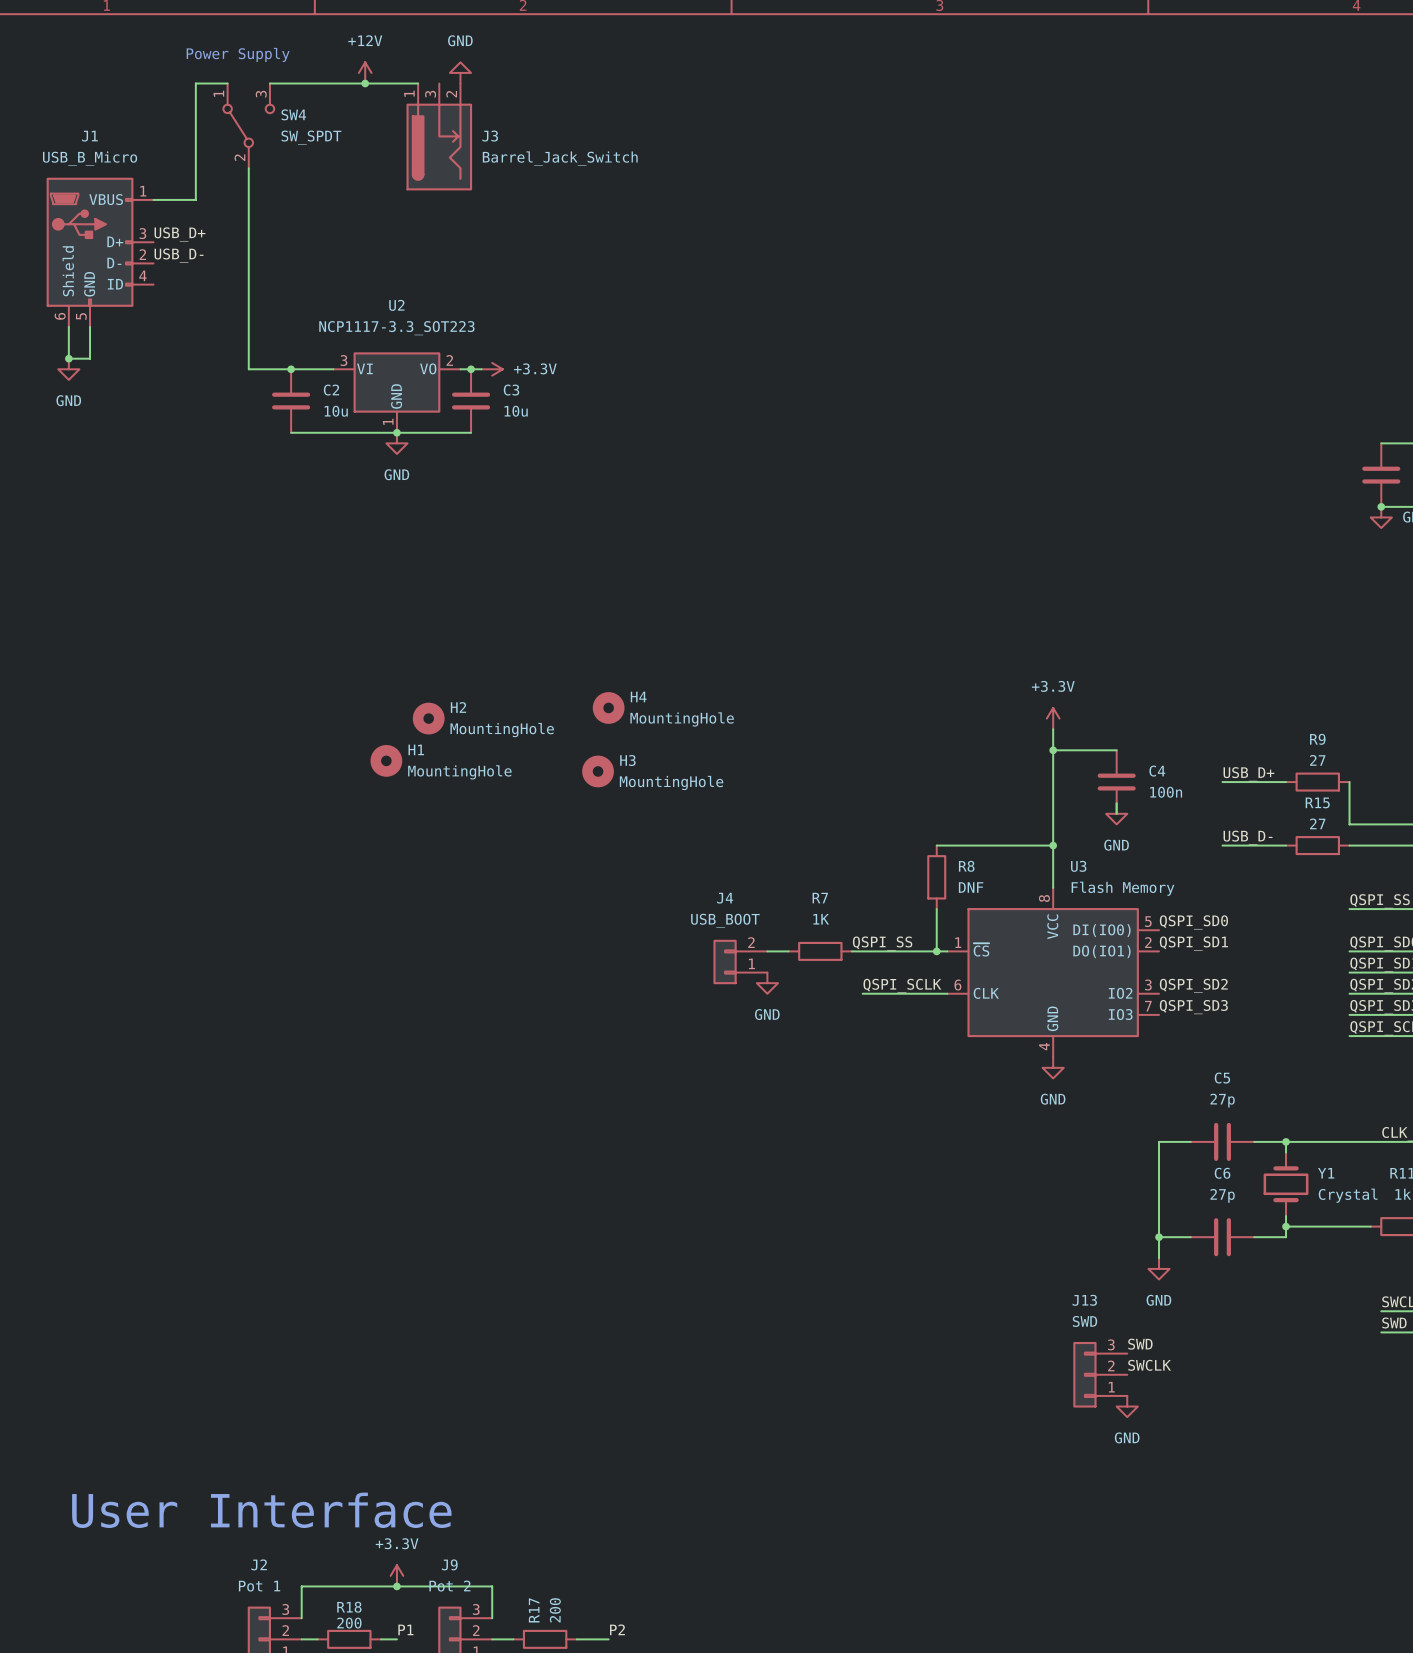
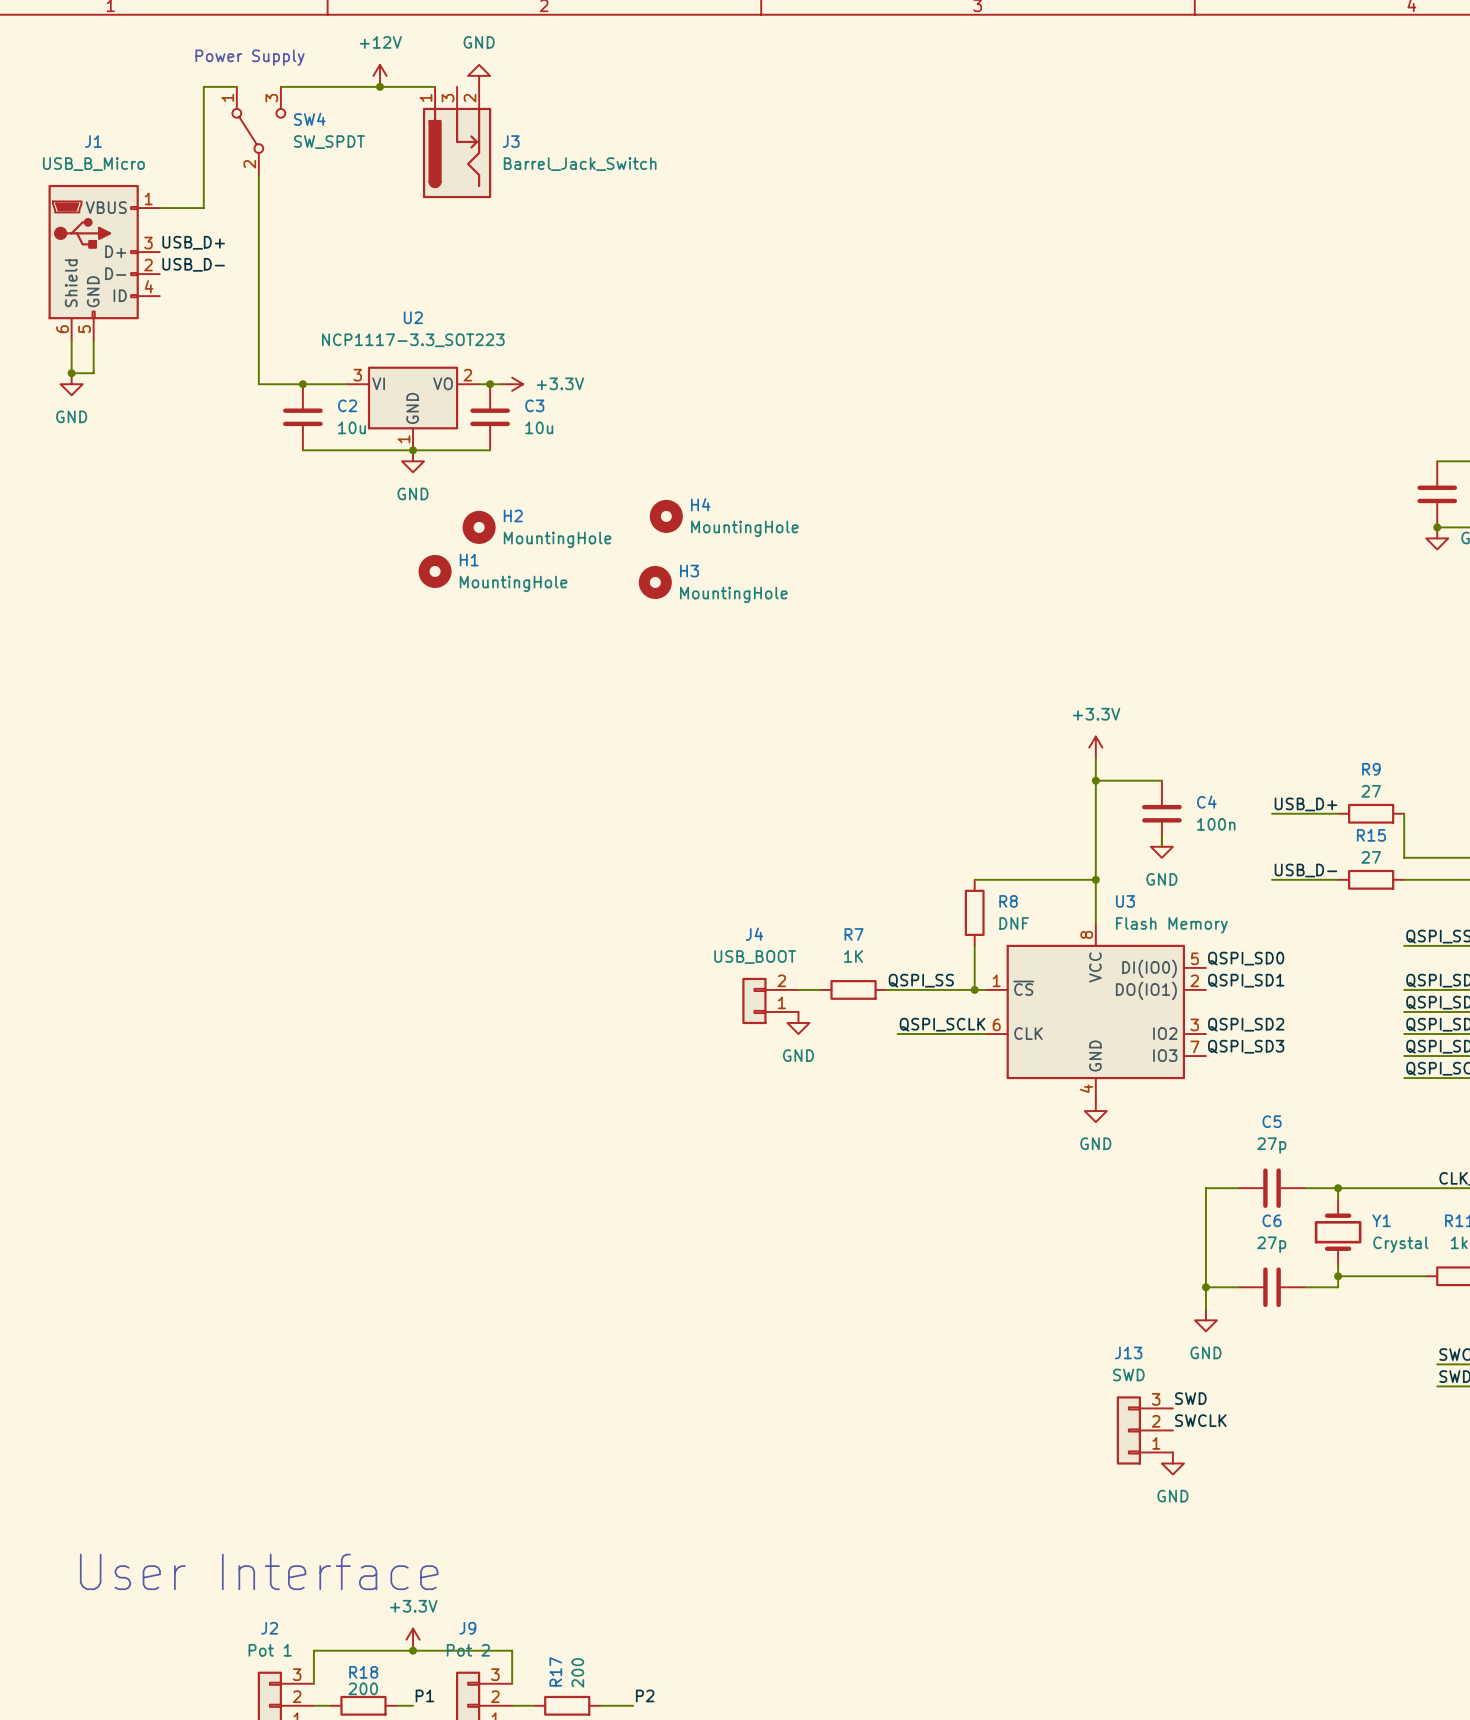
H4 position: (608, 707) -> (666, 516)
H2 position: (428, 718) -> (479, 527)
H1 position: (386, 760) -> (435, 571)
H3 position: (598, 771) -> (655, 582)

